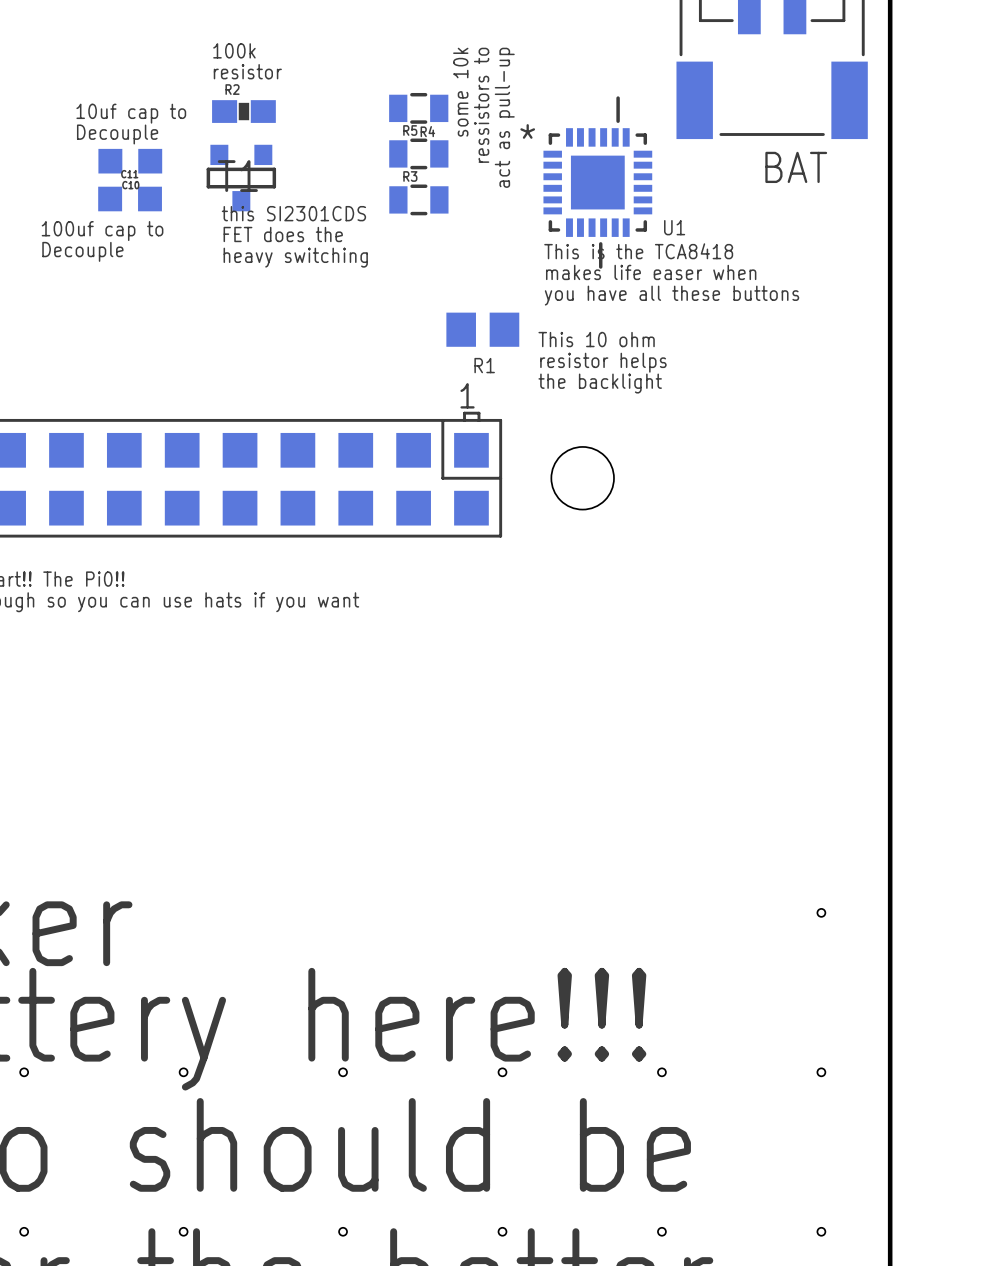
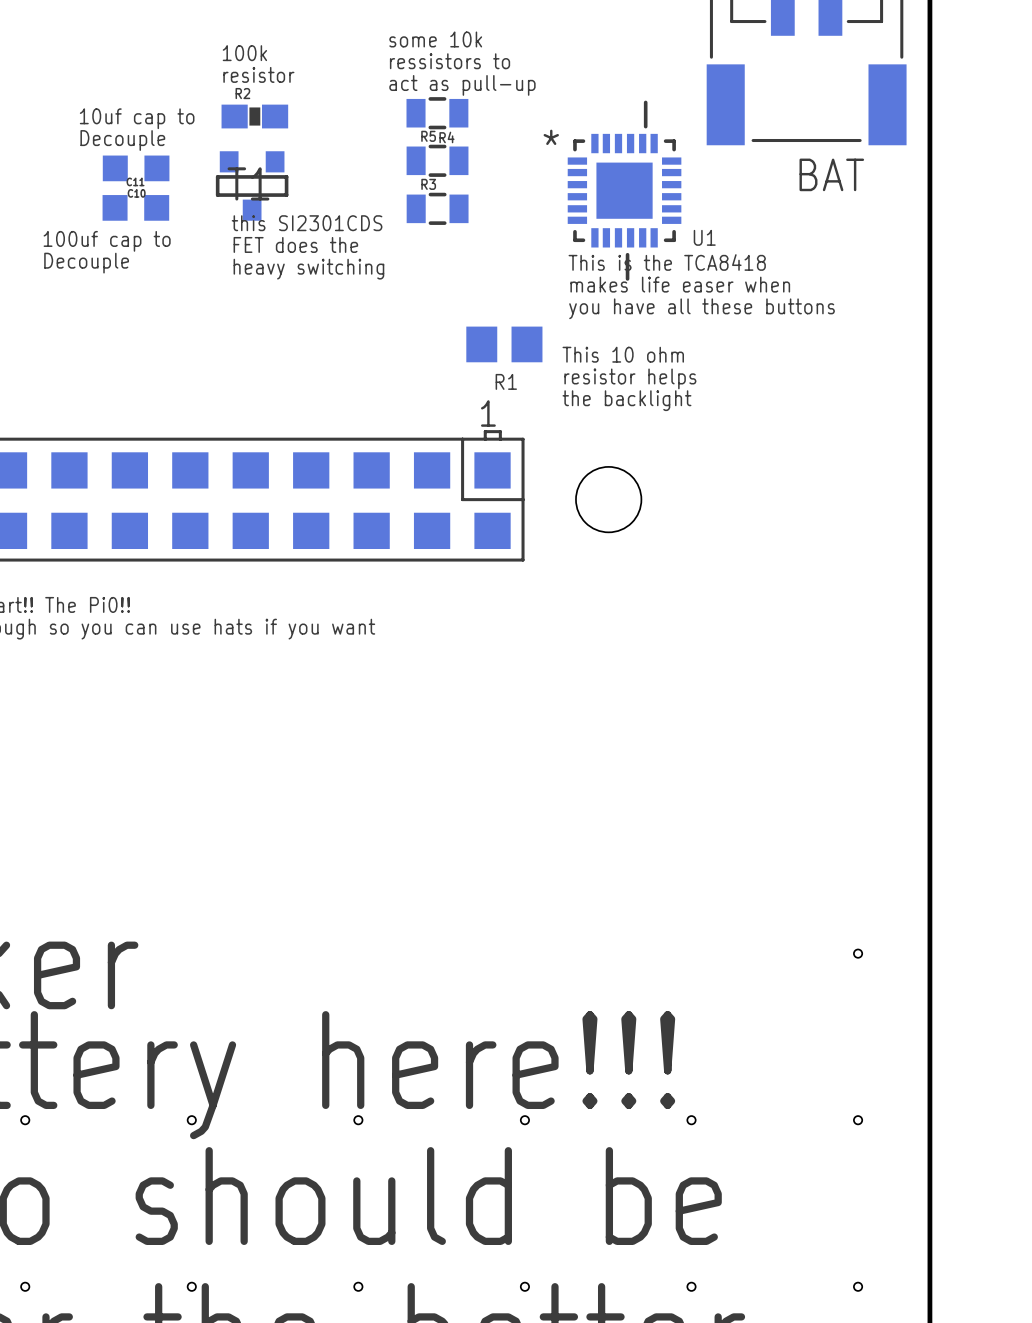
text rotation: 0° (460, 92) -> 90° clockwise (435, 39)
text rotation: 0° (481, 105) -> 90° clockwise (450, 61)
text rotation: 0° (504, 117) -> 90° clockwise (462, 85)

